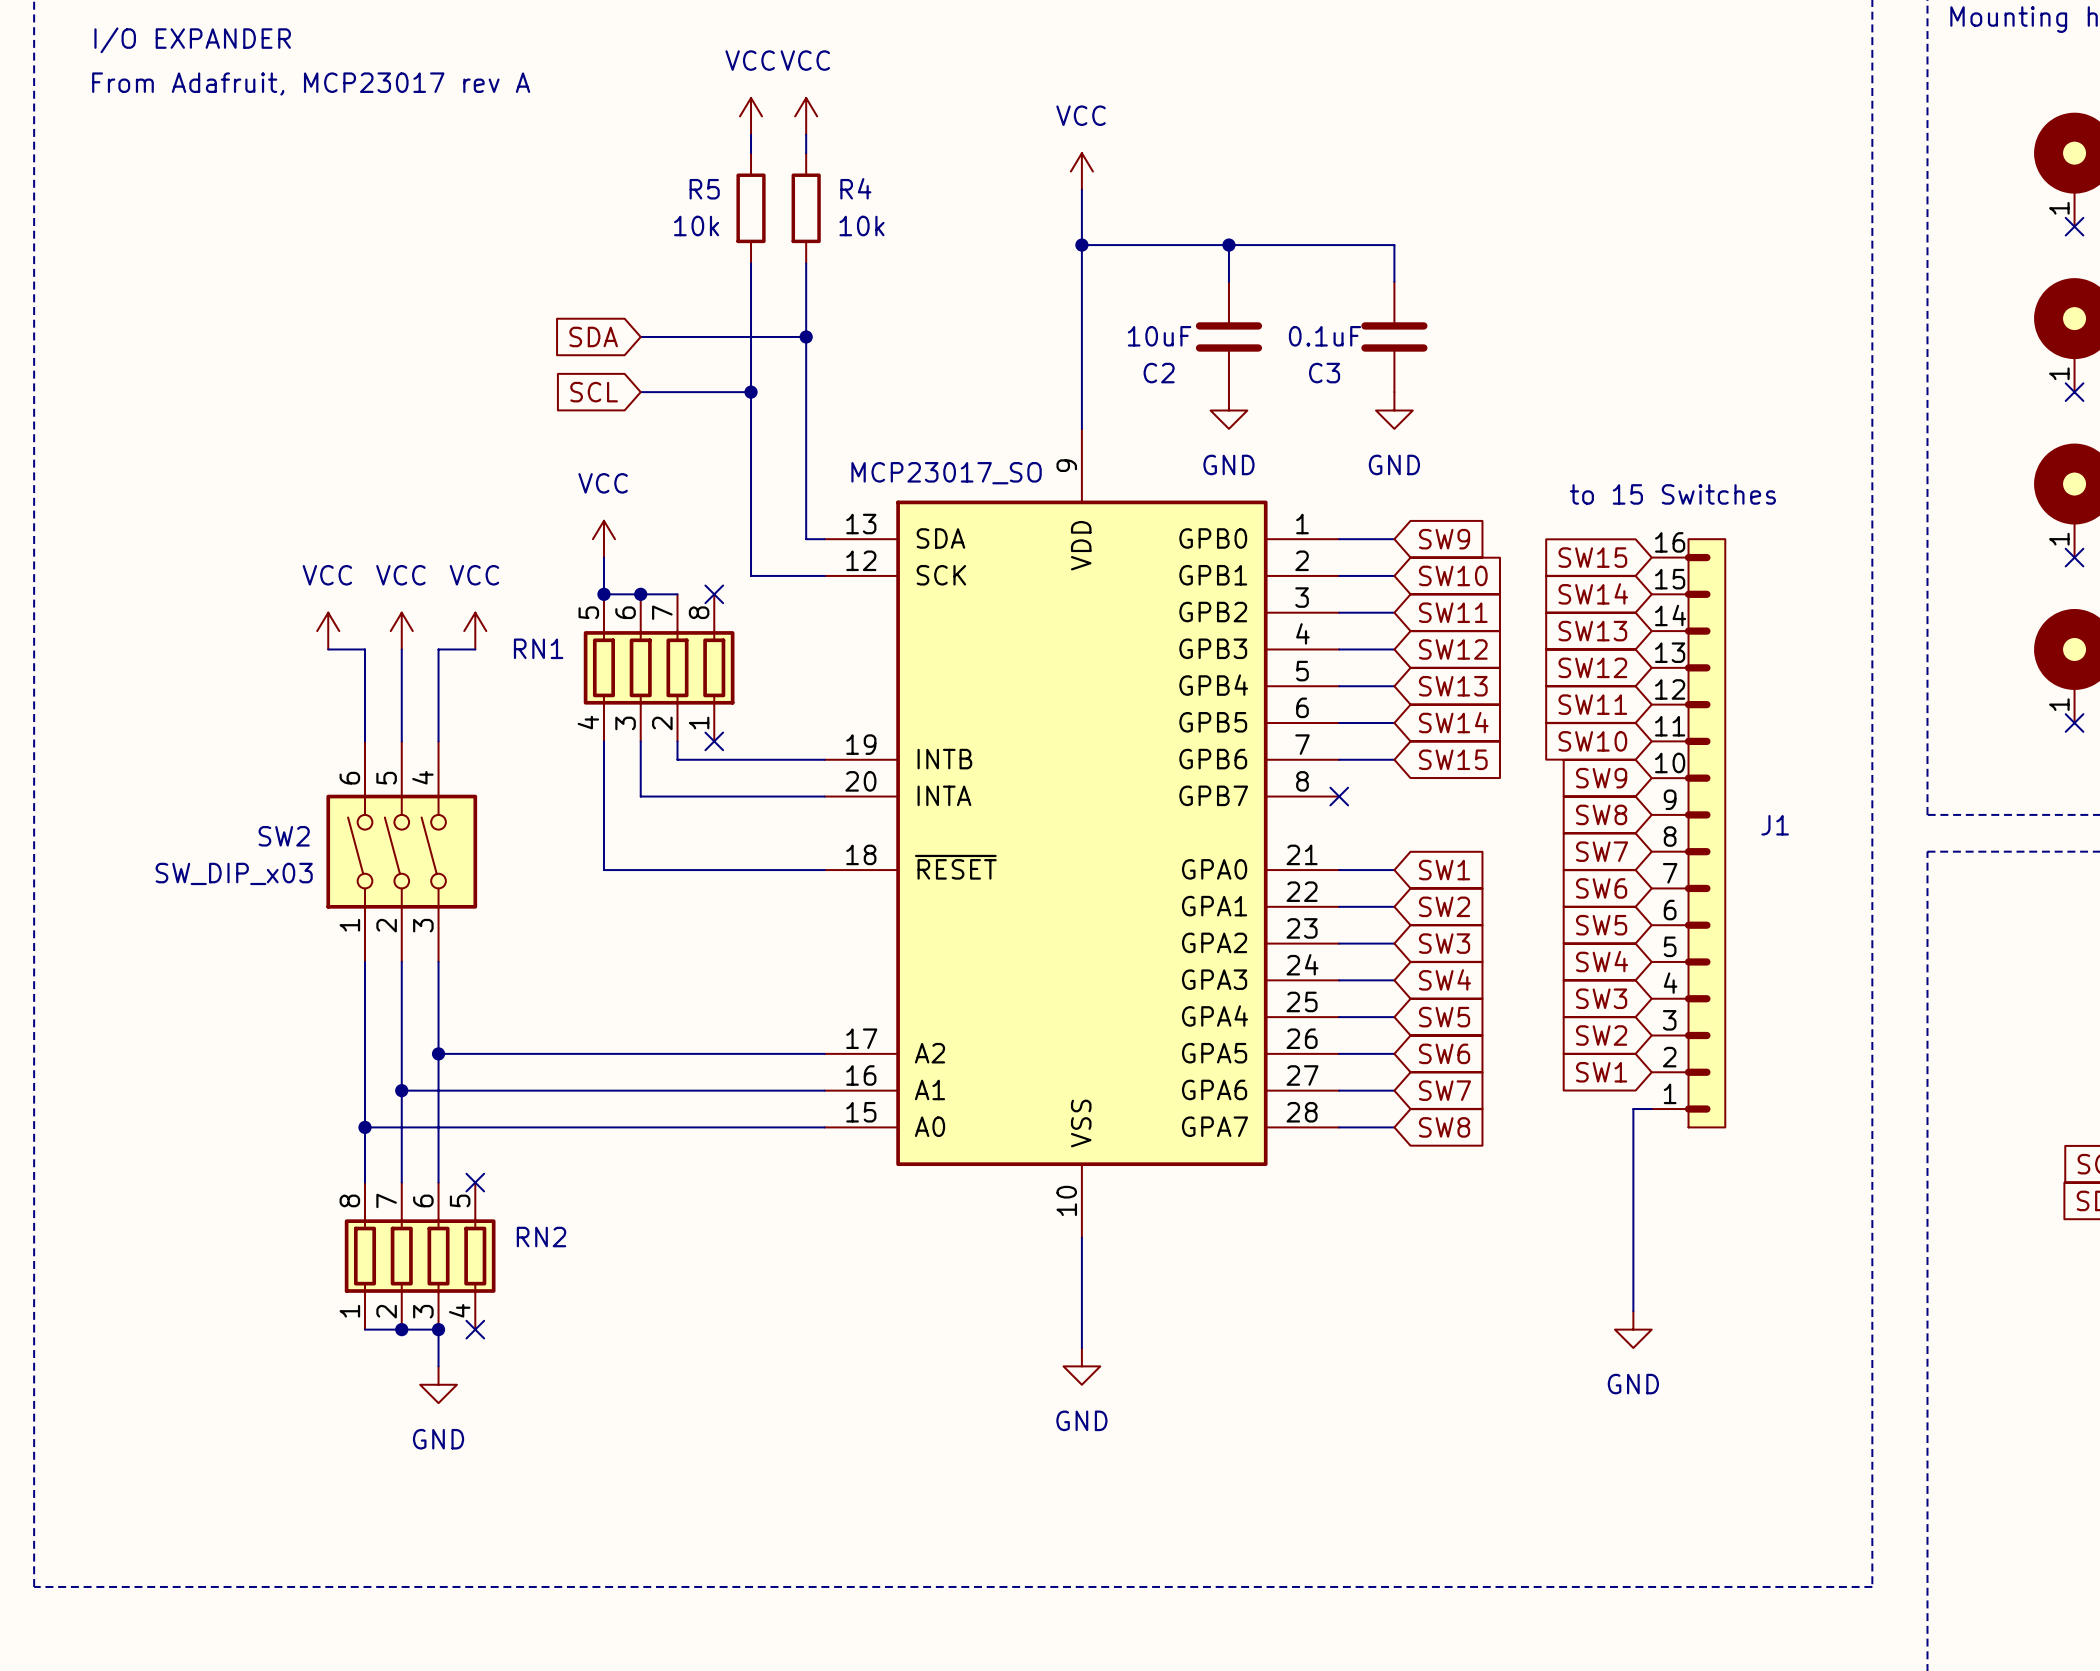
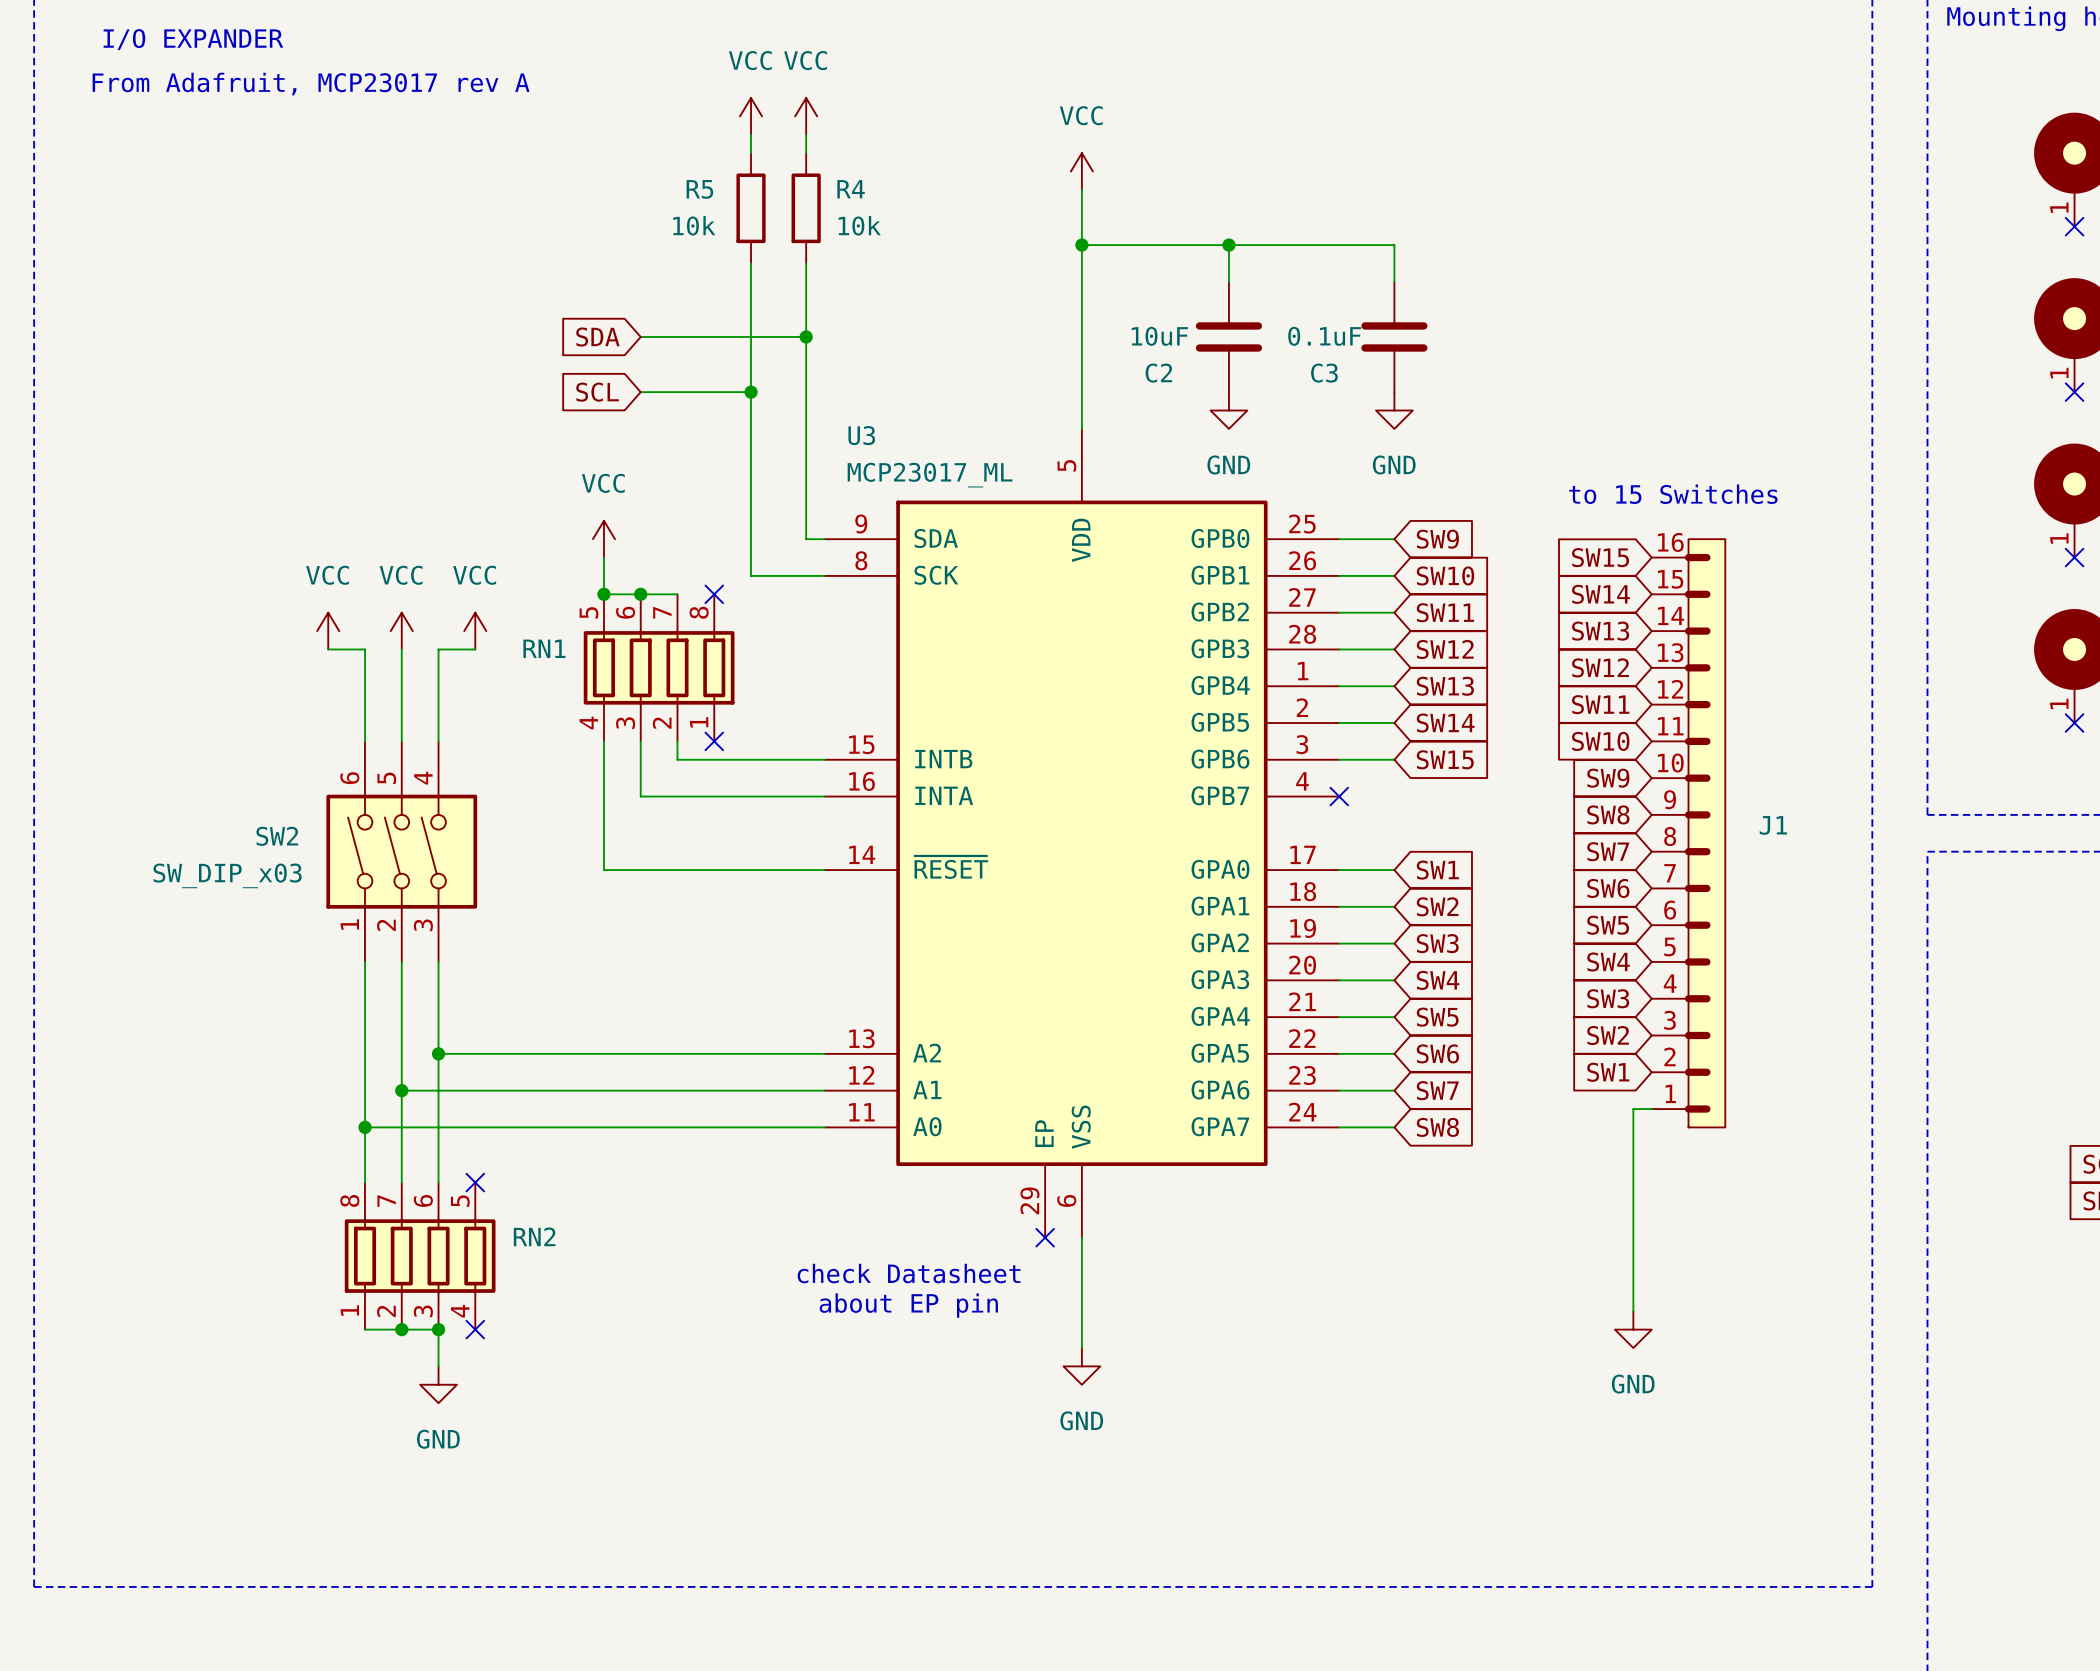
part: MCP23017_SO (1081, 833) -> none
U3: none -> MCP23017_ML (1081, 833)
no-connect mark: none -> (1045, 1237)
text: none -> check Datasheet (909, 1273)
text: none -> about EP pin (908, 1305)

